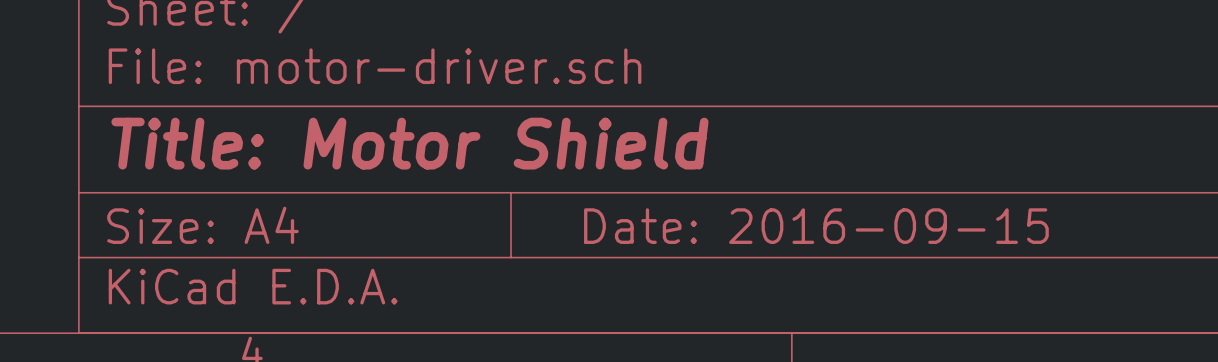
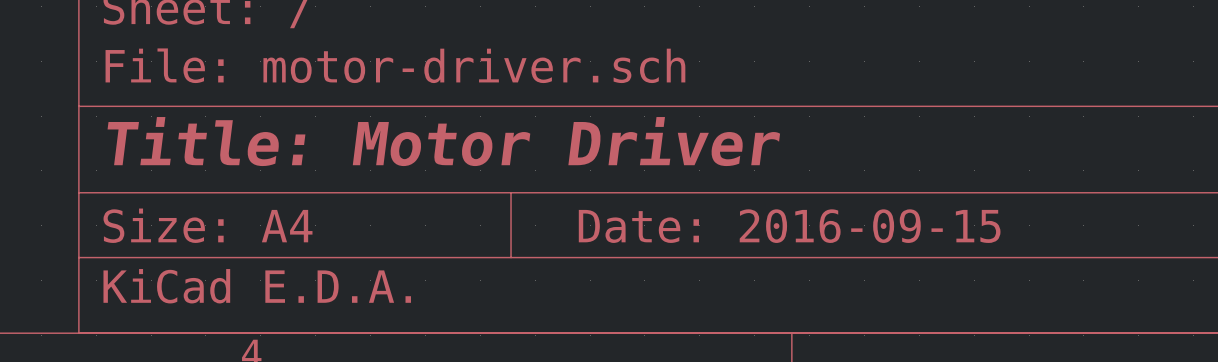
title block: Title: Motor Shield (409, 143) -> Title: Motor Driver (443, 141)

